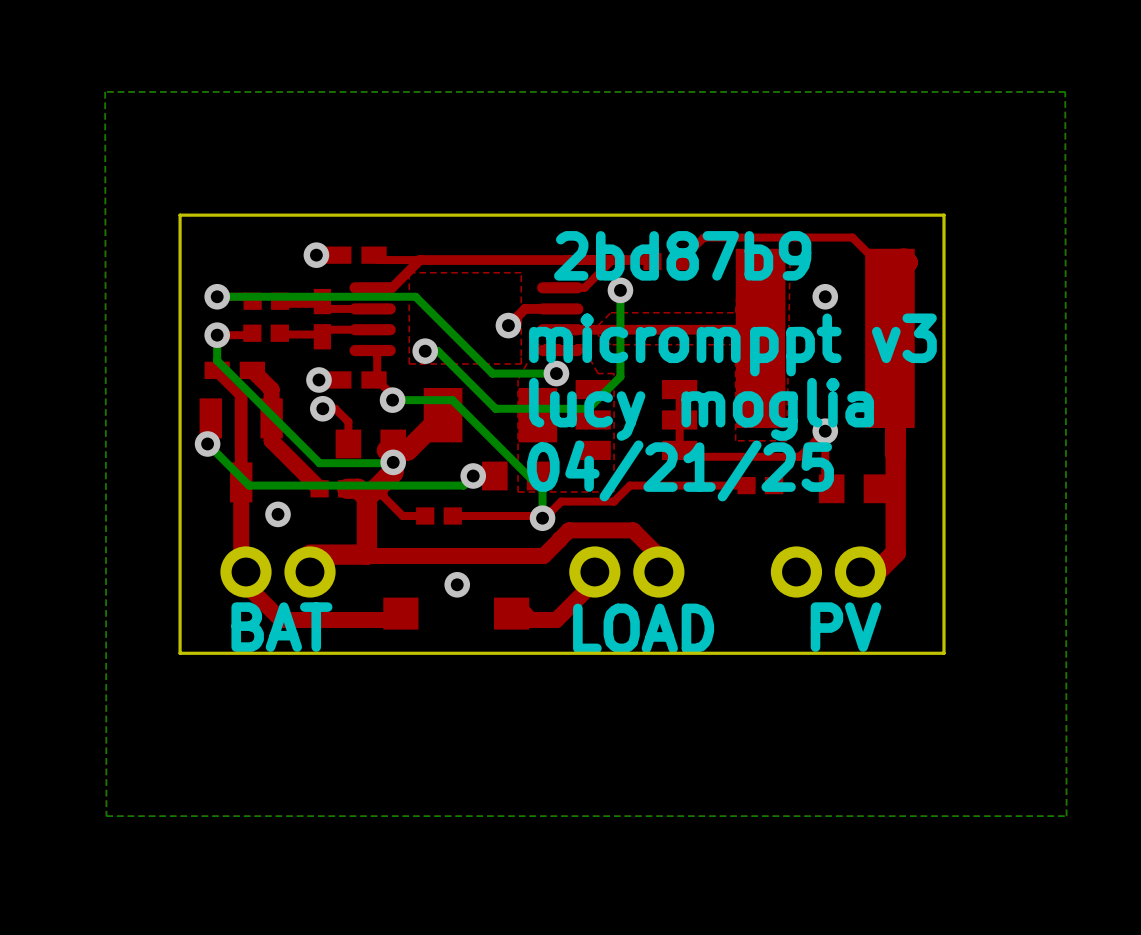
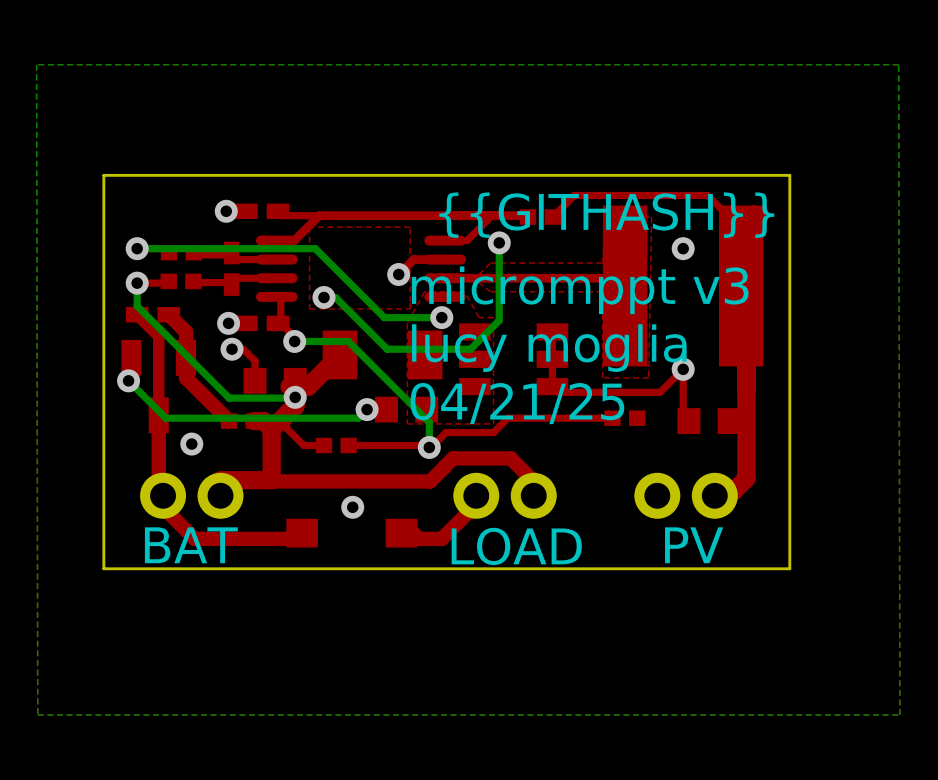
text: 2bd87b9 (682, 255) -> {{GITHASH}} (606, 215)

